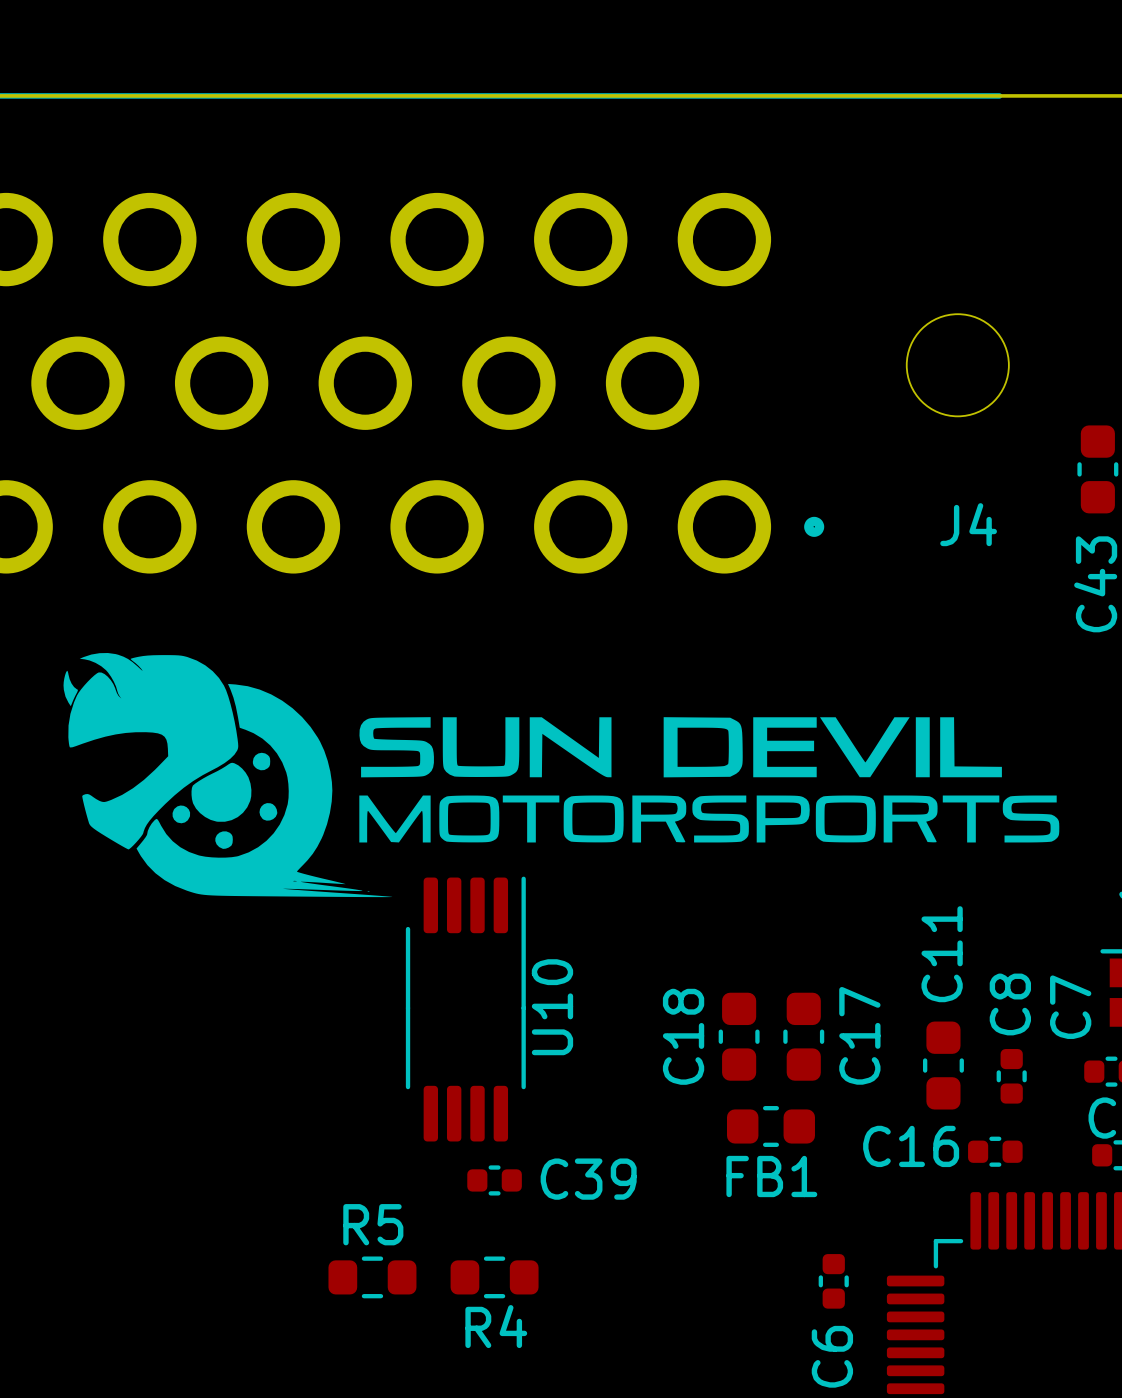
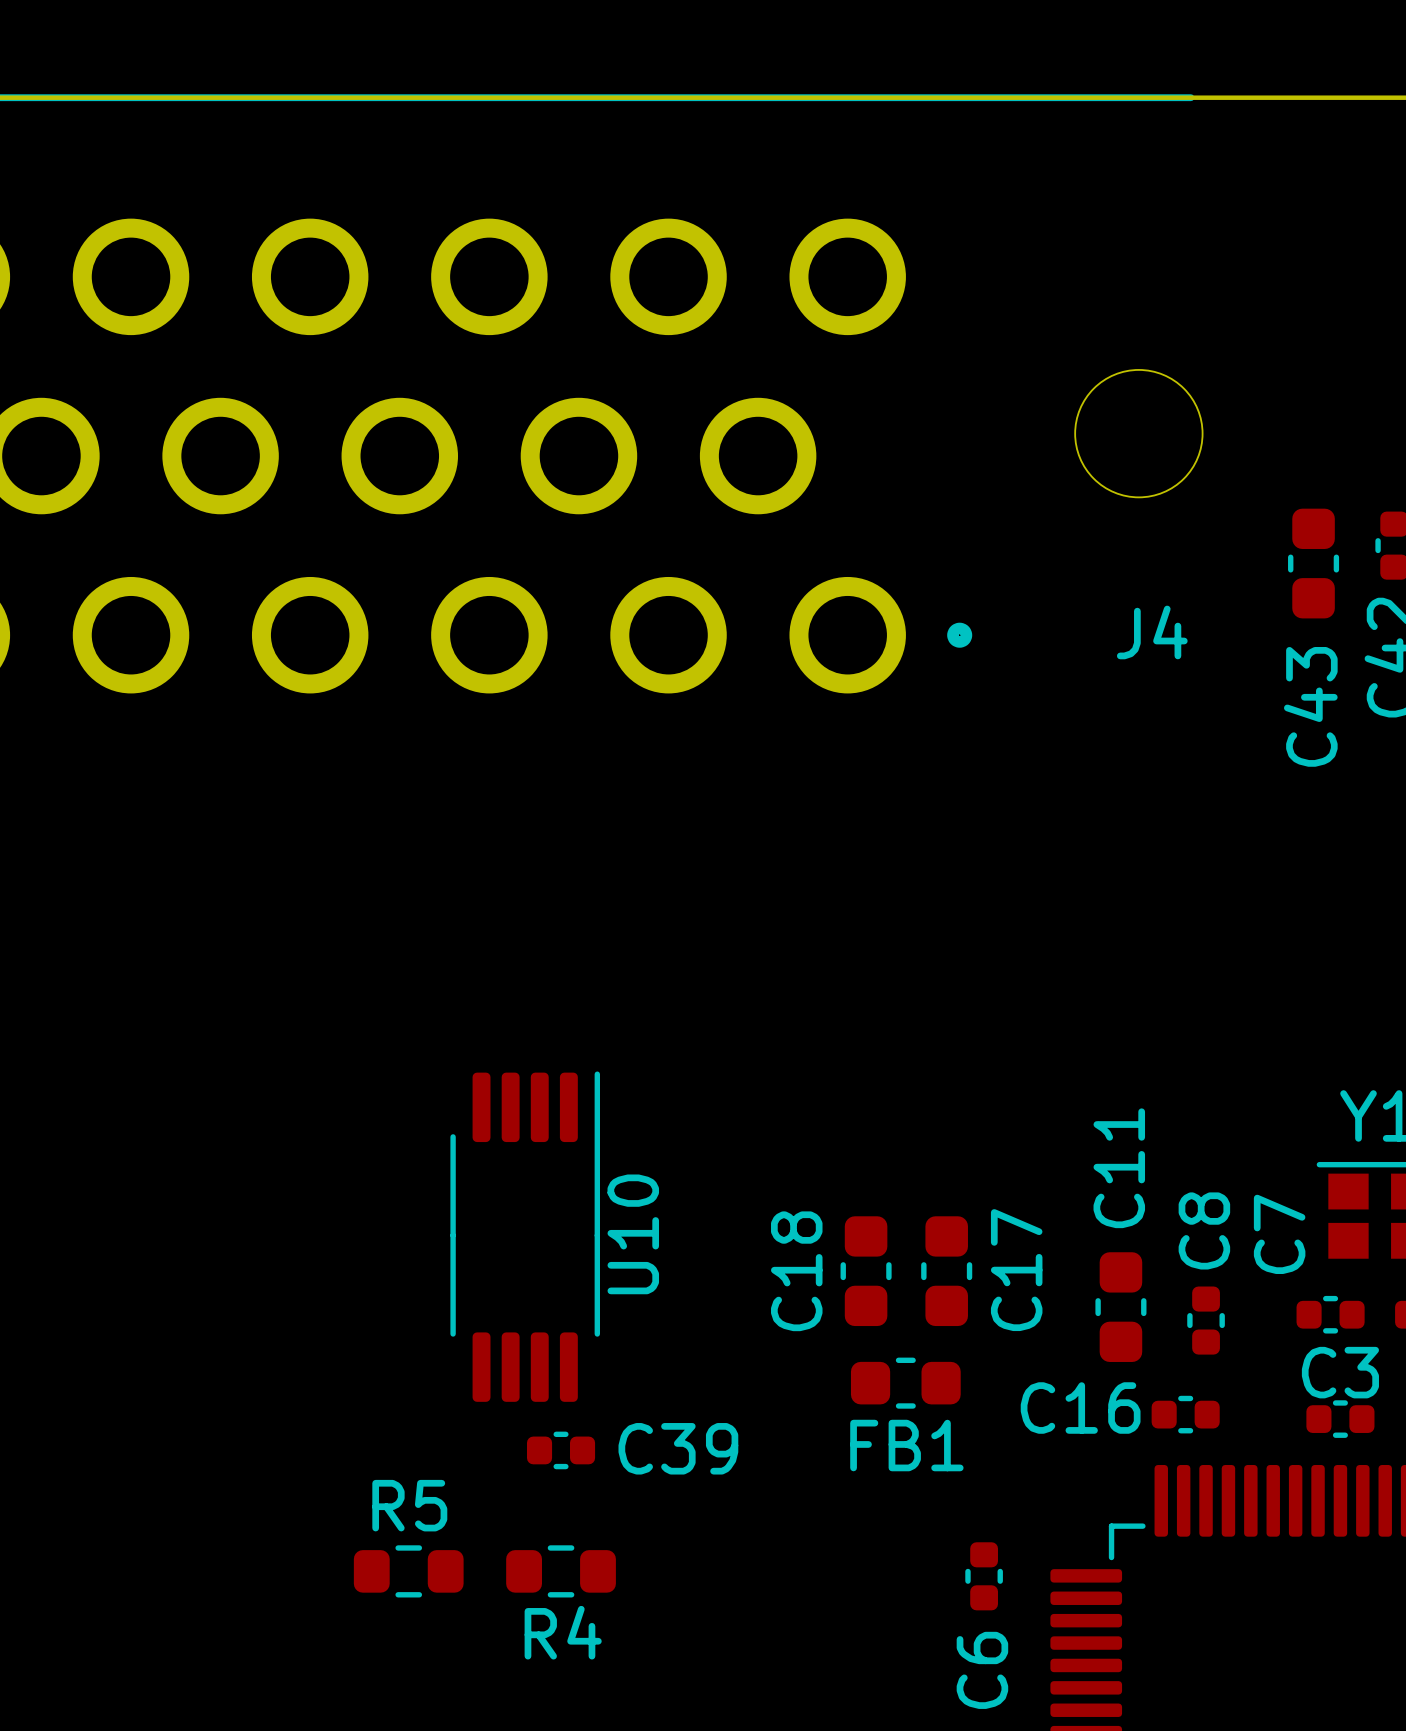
drawing: [63, 653, 1060, 898] -> none

